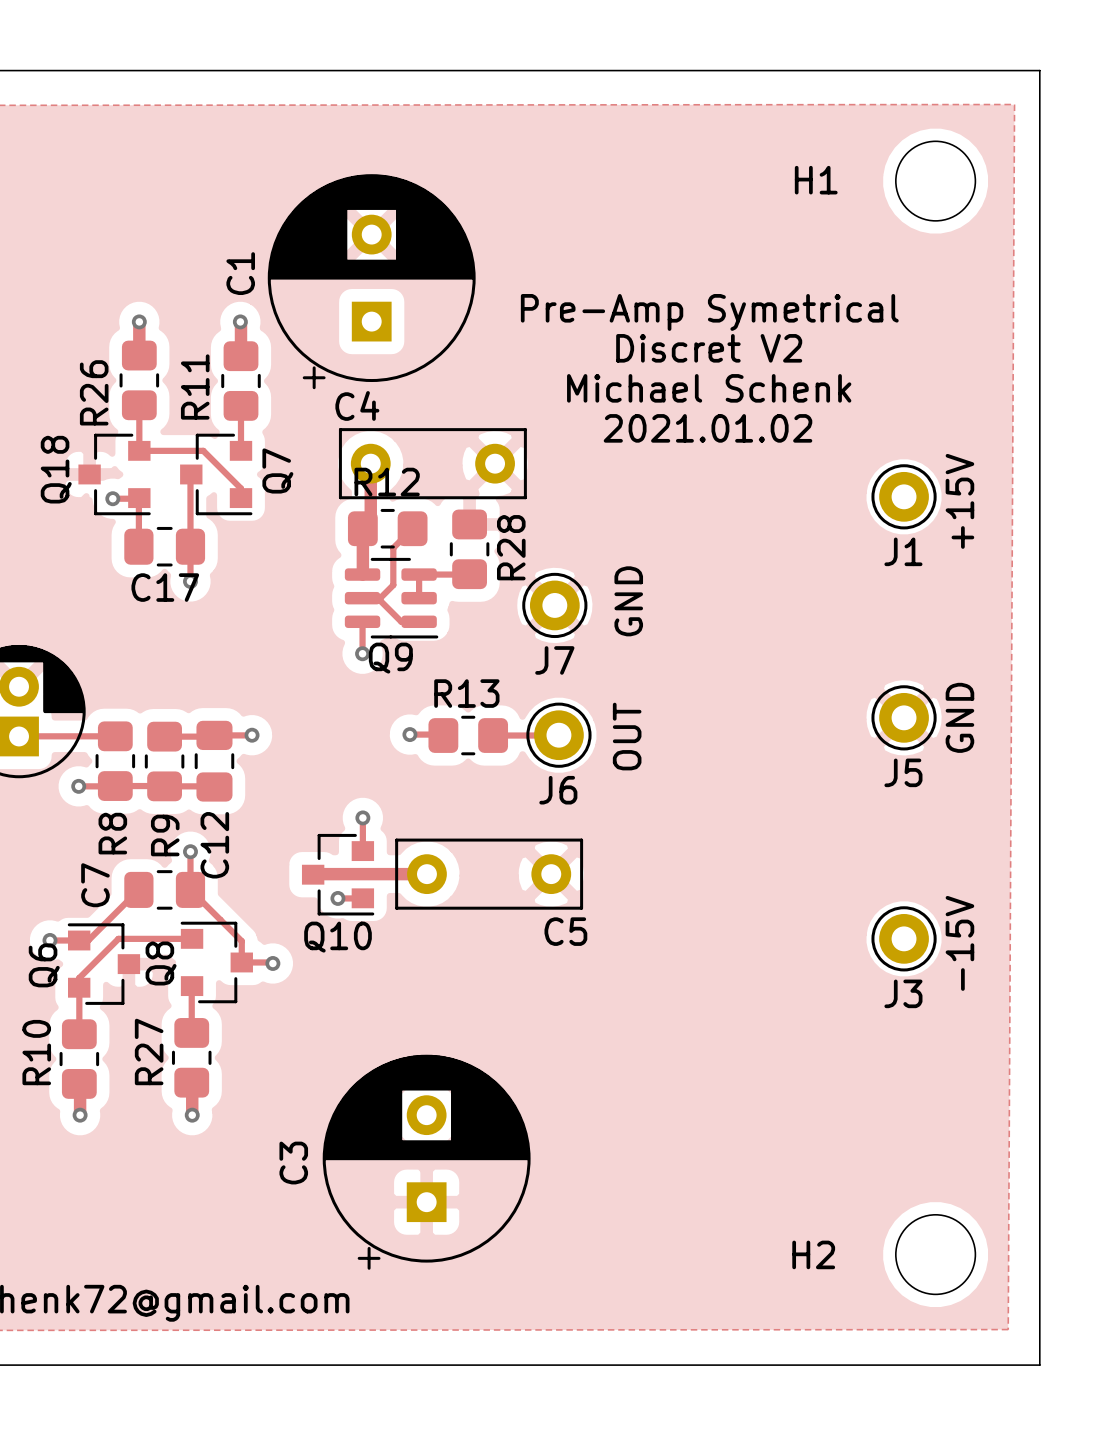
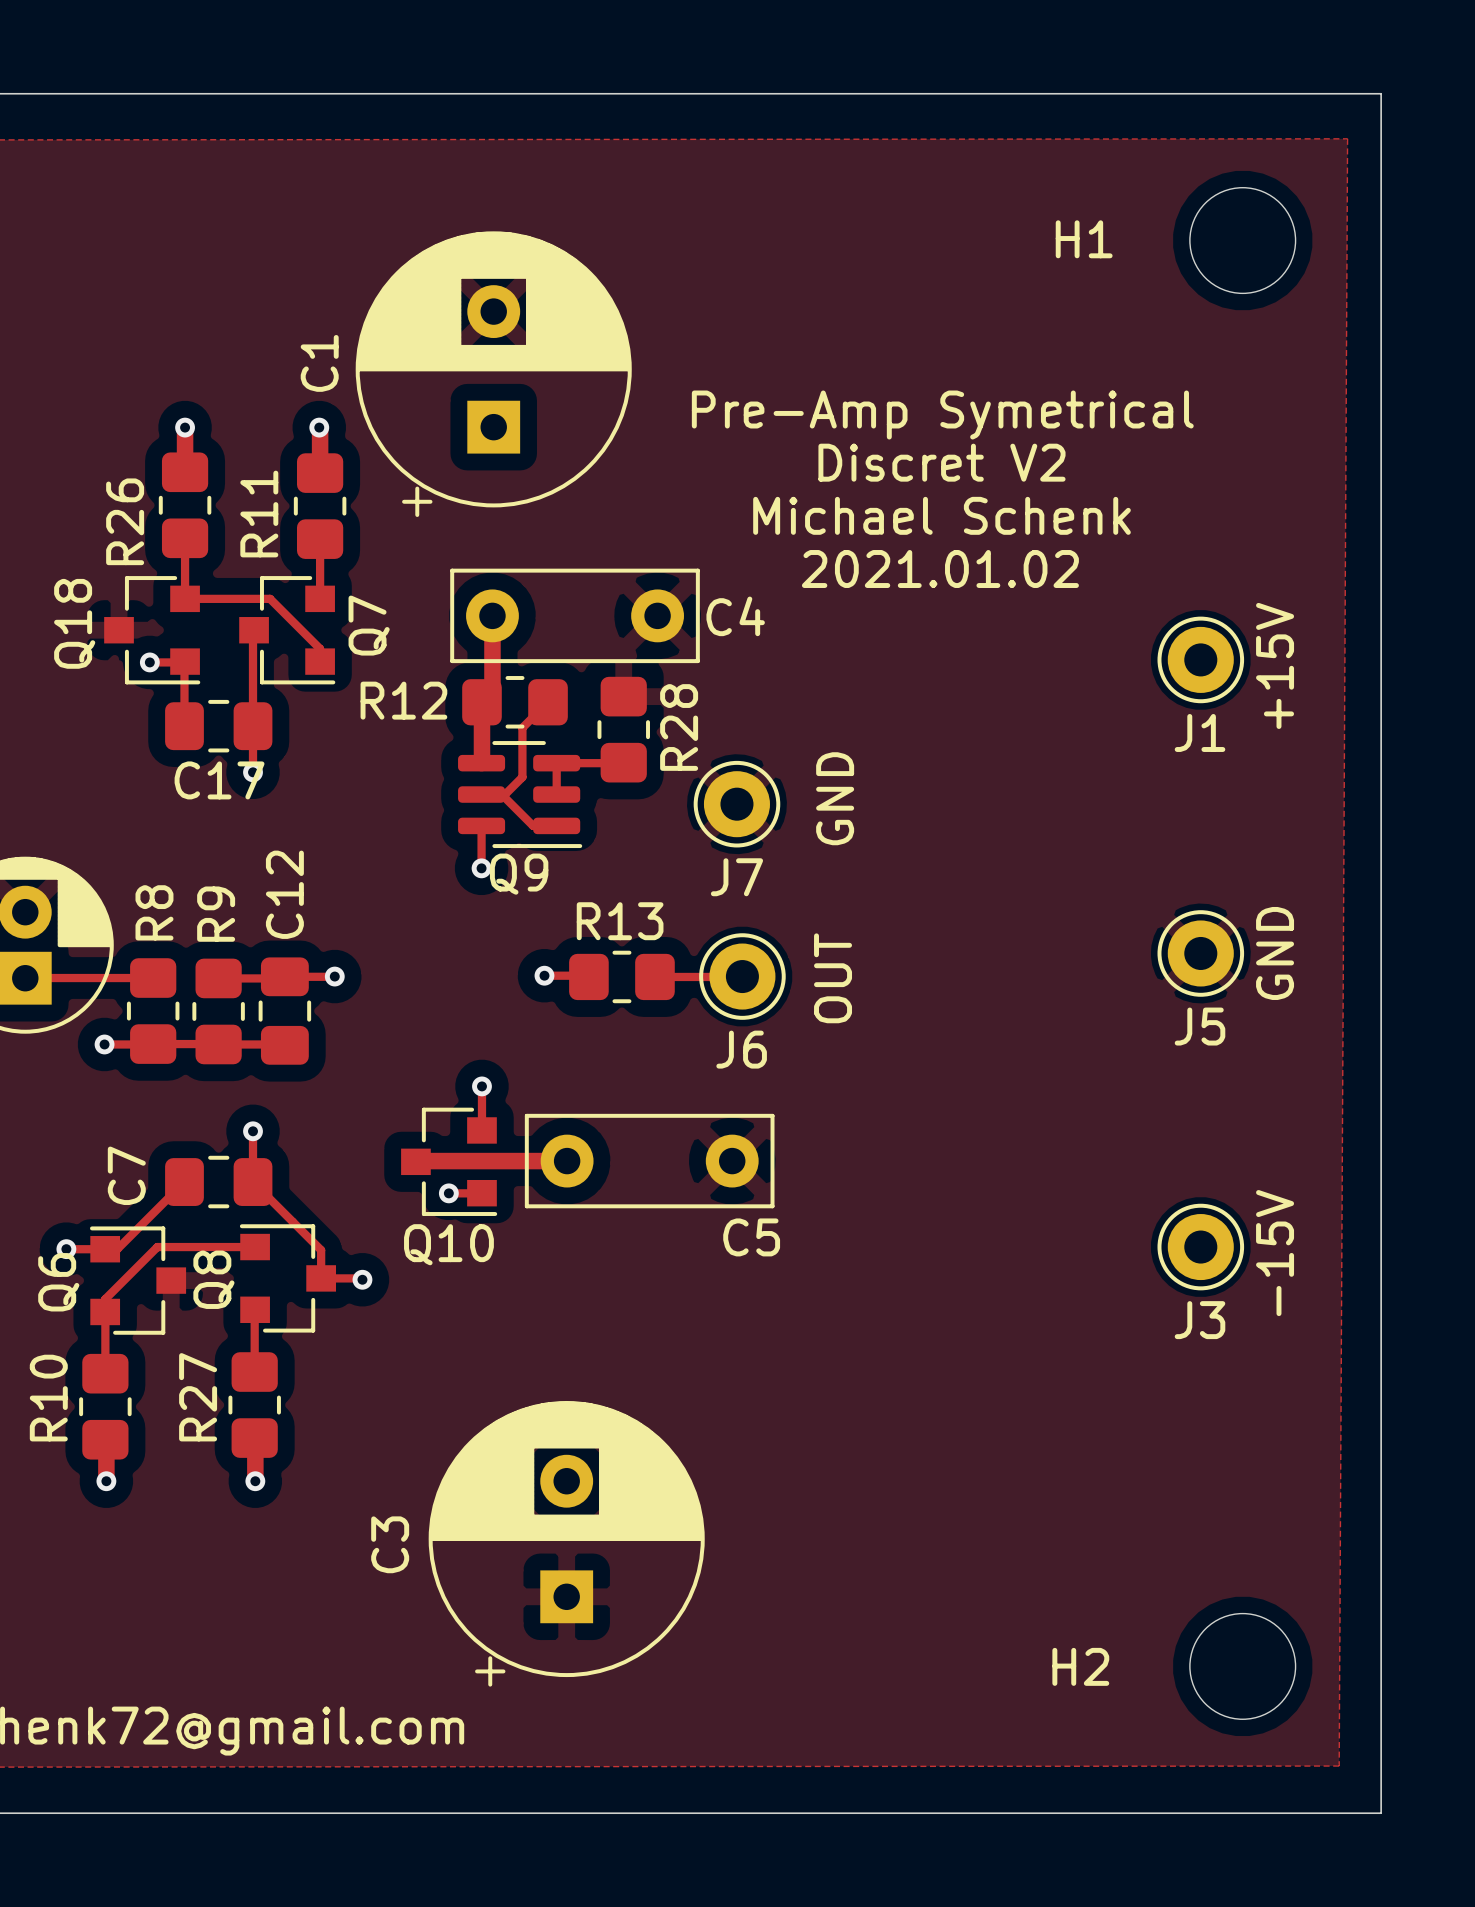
C4 name position: C4 (357, 405) -> C4 (735, 616)
R12 name position: R12 (387, 482) -> R12 (403, 700)
R8 name position: R8 (112, 833) -> R8 (154, 912)
R9 name position: R9 (165, 835) -> R9 (216, 914)
C12 name position: C12 (214, 845) -> C12 (284, 894)

